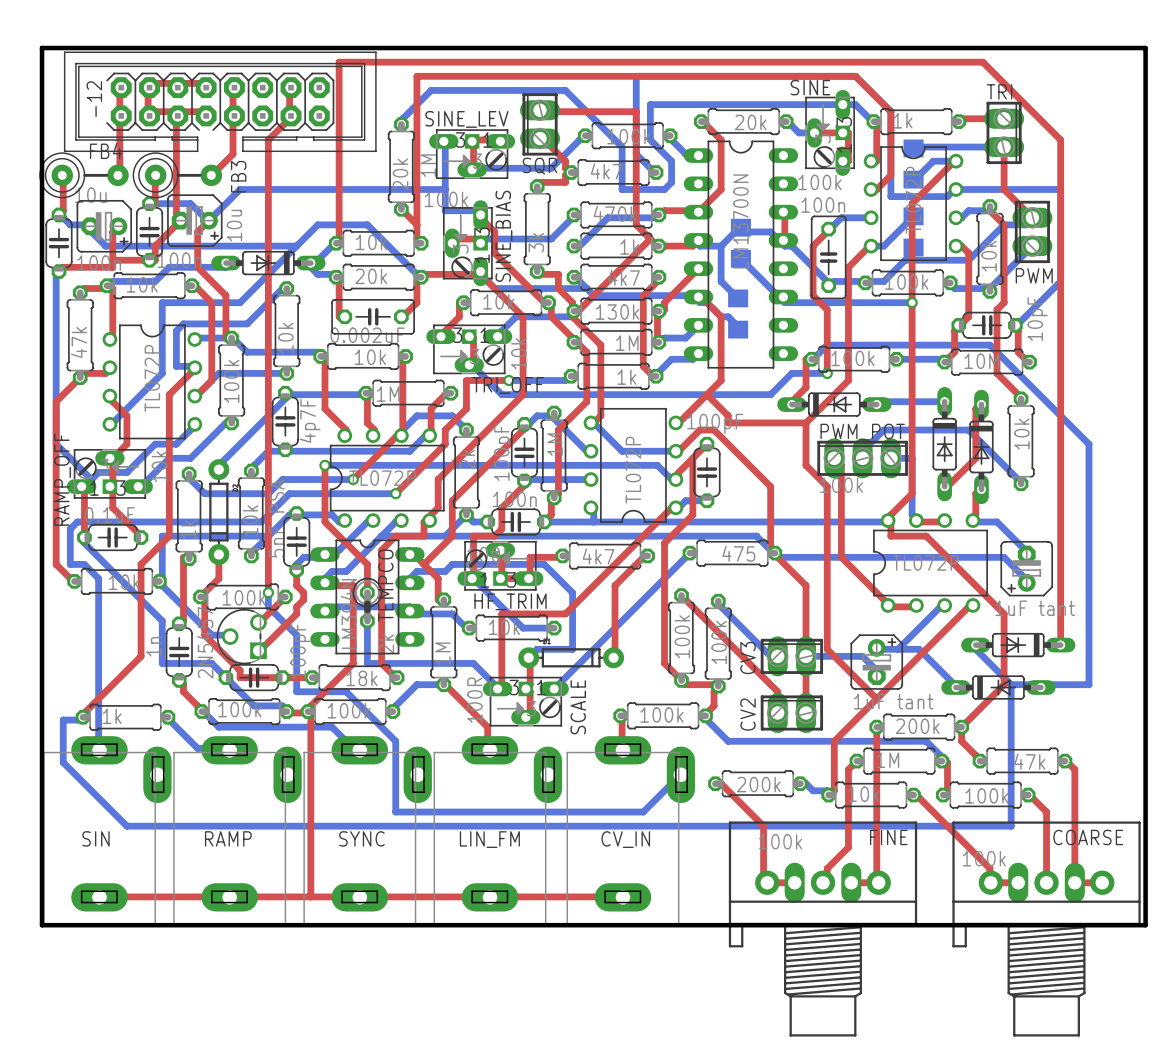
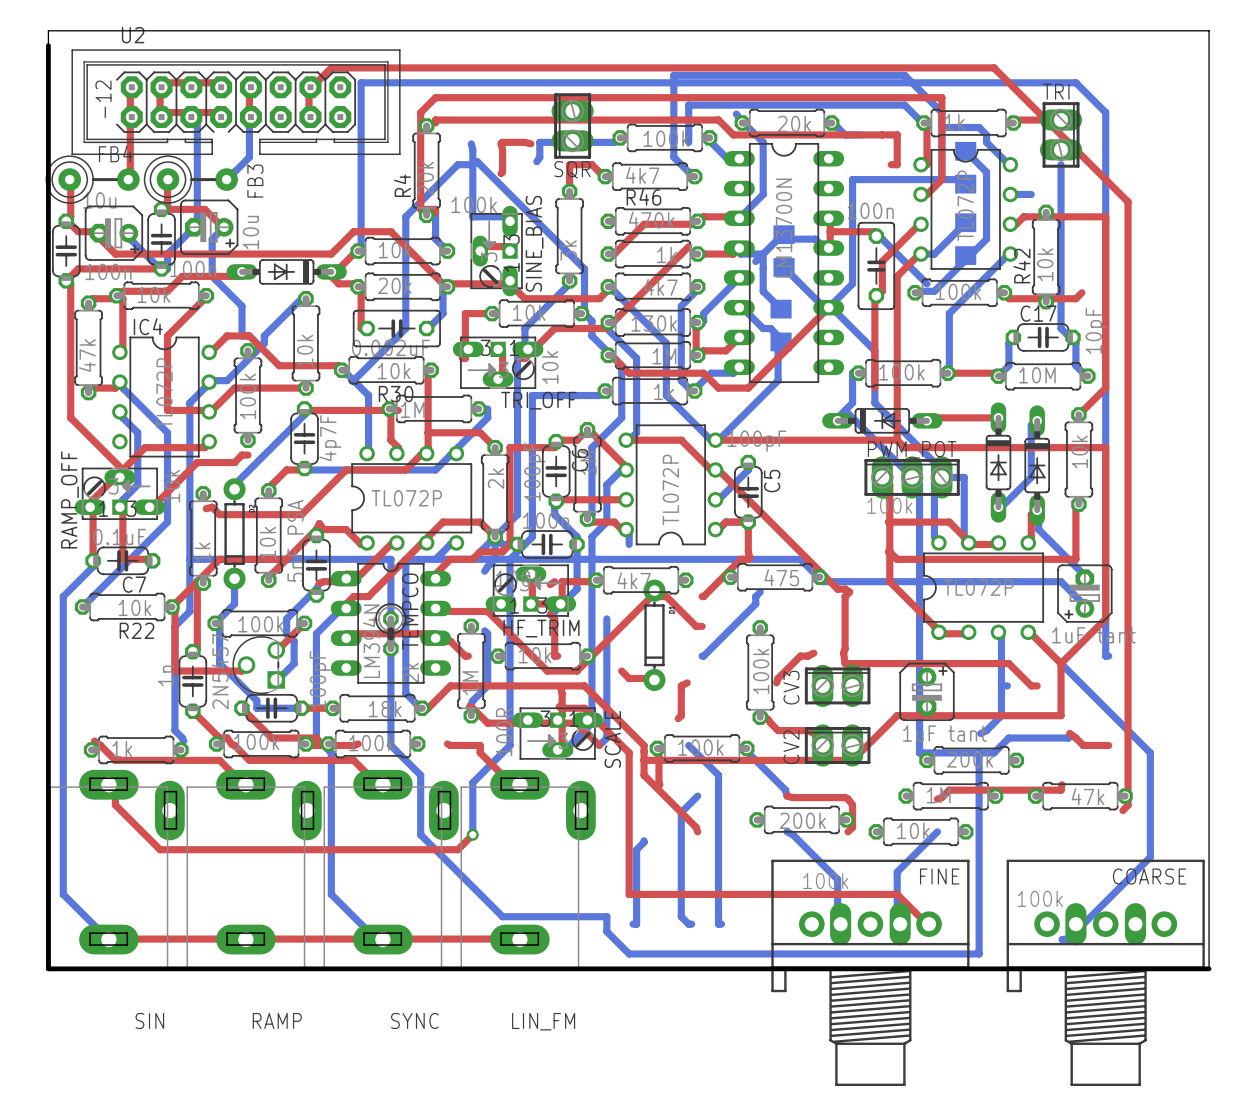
U2 name: none -> U2 (133, 35)
board edge: (42, 48) (1145, 48) (1144, 925) -> (48, 45) (48, 30) (1209, 30) (1209, 968)
top track: none -> (310, 87) (331, 67) (994, 67) (1128, 201) (1128, 805) (1122, 810)
top track: (540, 110) (636, 111) (636, 224) (657, 246) -> none
top track: (890, 111) (855, 76) (416, 76) (416, 239) (421, 243) -> (941, 112) (941, 97) (435, 97) (420, 112) (420, 209) (435, 209) (435, 212)
bottom track: none -> (736, 114) (763, 142) (763, 194) (739, 218)
top track: (177, 115) (176, 217) (180, 220) (155, 246) (155, 260) (149, 260) -> none
bottom track: none -> (191, 117) (197, 120) (197, 224) (167, 254) (167, 268) (160, 268) (130, 239) (128, 233)
top track: (234, 115) (233, 154) (211, 175) -> none
bottom track: none -> (250, 117) (249, 157) (232, 173)
top track: (291, 115) (268, 139) (268, 592) -> none
top track: none -> (435, 123) (435, 120) (718, 120) (733, 134) (861, 134)
top track: (701, 121) (721, 139) (721, 189) (698, 212) -> none
bottom track: (401, 124) (402, 118) (431, 90) (565, 90) (622, 147) (622, 189) (664, 189) (671, 182) (671, 161) (650, 139) -> none
SINE: 100k (830, 132) -> none
top track: (540, 138) (544, 139) (565, 161) (565, 168) -> none
bottom track: (579, 139) (551, 168) (472, 169) -> (614, 142) (539, 142) (539, 157) (536, 161)
top track: (1004, 147) (1004, 189) (1032, 217) -> none
bottom track: (1004, 147) (913, 148) -> (965, 255) (971, 254) (986, 239) (986, 172) (965, 151)
SINE_LEV: 1M (472, 154) -> none
bottom track: (954, 161) (933, 161) (913, 179) -> (1008, 164) (986, 142) (986, 134) (979, 127) (941, 127)
top track: (955, 161) (912, 203) (912, 493) (890, 514) (888, 520) (890, 521) (890, 536) -> (888, 551) (897, 559) (941, 559)
bottom track: none -> (1061, 164) (1061, 328) (1072, 337) (1075, 343) (1075, 365) (1087, 376)
top track: (571, 172) (565, 175) (565, 182) (537, 182) -> (599, 172) (591, 164) (569, 164) (569, 187)
bottom track: (890, 175) (890, 196) (947, 196) (955, 189) -> none
R4 name: none -> R4 (402, 185)
bottom track: (445, 189) (240, 189) (208, 220) (190, 203) (149, 203) -> none
bottom track: (975, 189) (1060, 189) (1060, 281) (1015, 325) -> none
R46 name: none -> R46 (643, 197)
bottom track: none -> (435, 212) (435, 239) (447, 251)
bottom track: (989, 206) (989, 210) (968, 210) (961, 217) (955, 217) -> none
top track: (401, 209) (416, 224) -> none
top track: (989, 210) (1004, 224) (1004, 302) (997, 309) (997, 373) (1021, 398) -> (1010, 224) (1016, 224) (1023, 216) (1105, 216) (1105, 388) (1078, 414)
bottom track: (59, 214) (70, 224) (90, 226) (91, 231) (105, 246) (296, 246) -> none
top track: (480, 214) (480, 217) (494, 231) (494, 253) (544, 302) (551, 302) (551, 316) (572, 338) (573, 342) -> none
bottom track: (573, 214) (551, 239) (480, 239) (480, 243) -> none
top track: none -> (697, 221) (696, 224) (644, 224) (614, 254) (608, 254)
bottom track: (658, 214) (657, 217) (607, 217) (579, 246) (573, 246) -> none
bottom track: (871, 217) (841, 217) (828, 229) -> (927, 283) (882, 239) (876, 236)
bottom track: (1032, 217) (1025, 224) (1004, 224) (968, 260) (905, 260) -> none
top track: (208, 220) (197, 231) (197, 267) (225, 295) (225, 338) (231, 338) -> (224, 227) (204, 209) (167, 209)
top track: none -> (830, 231) (874, 231) (876, 236)
top track: (118, 226) (112, 231) (112, 267) (63, 267) -> (122, 268) (78, 268) (70, 276)
top track: (828, 229) (813, 246) (813, 295) (827, 309) -> (921, 224) (882, 261) (882, 291) (874, 298) (874, 321)
PWM: (1032, 231) -> none
bottom track: (783, 240) (784, 246) (791, 246) (827, 281) (828, 285) (834, 281) (865, 282) -> none
top track: (336, 243) (339, 239) (339, 62) (982, 62) (1060, 139) (1060, 645) -> (358, 251) (338, 268) (331, 268) (331, 276) (338, 283) (353, 283) (358, 286)
bottom track: (336, 243) (317, 260) (310, 260) (310, 267) (317, 274) (332, 274) (336, 277) -> (358, 251) (361, 246) (361, 82) (1075, 82) (1105, 112) (1105, 656) (1108, 656)
bottom track: none -> (763, 254) (755, 261)
top track: (955, 246) (961, 246) (968, 253) (968, 316) (954, 330) (954, 352) (944, 362) -> (947, 373) (994, 373) (998, 376)
bottom track: none -> (1010, 254) (949, 313) (949, 373)
bottom track: (1032, 246) (989, 288) -> none
R42 name: none -> R42 (1021, 266)
top track: none -> (241, 271) (241, 276) (182, 276) (167, 291) (122, 291) (116, 295)
bottom track: (225, 263) (225, 267) (169, 267) (155, 281) (112, 281) (107, 285) -> none
top track: (698, 268) (664, 302) (664, 309) (658, 311) -> none
bottom track: none -> (739, 277) (703, 313) (703, 321) (697, 322)
top track: none -> (66, 280) (70, 283) (70, 417) (122, 469)
bottom track: (59, 271) (56, 274) (56, 444) (91, 479) (81, 486) (84, 486) (98, 472) (126, 472) (155, 444) (176, 444) (194, 424) -> none
bottom track: (480, 271) (480, 274) (494, 288) (586, 288) -> none
top track: (537, 271) (537, 274) (558, 274) (558, 288) (572, 302) (573, 311) -> none
bottom track: none -> (569, 280) (569, 283) (524, 328) (524, 358) (517, 358) (517, 514) (495, 536) (495, 559) (484, 571)
top track: (421, 277) (416, 281) (416, 302) (401, 316) -> (447, 286) (390, 231) (353, 231) (331, 254) (115, 254) (100, 239) (99, 233) (78, 231) (66, 221)
bottom track: (421, 277) (367, 224) (317, 224) (240, 302) (162, 302) (162, 373) (109, 424) -> (447, 286) (443, 291) (443, 313) (426, 328)
top track: (658, 277) (657, 281) (643, 295) (643, 366) (656, 376) -> none
bottom track: none -> (697, 286) (696, 291) (681, 306) (681, 380) (694, 391)
top track: none -> (1004, 292) (1008, 298) (1075, 298) (1081, 292)
bottom track: (950, 282) (954, 288) (989, 288) -> none
top track: (191, 285) (197, 288) (211, 302) (211, 380) -> (206, 295) (167, 335) (167, 410) (209, 411)
top track: (494, 288) (523, 316) (523, 394) (438, 479) (438, 507) (431, 514) (429, 520) (424, 521) (424, 536) (395, 536) (381, 550) (381, 663) (397, 677) -> (524, 298) (599, 298) (608, 286)
bottom track: (593, 295) (692, 295) (698, 297) (699, 302) (706, 302) -> (629, 306) (666, 343) (666, 395) (711, 440) (718, 440) (778, 380) (778, 343) (781, 341)
top track: (698, 297) (699, 295) (721, 316) (721, 380) (678, 422) -> none
bottom track: (783, 297) (784, 302) (912, 302) -> (828, 307) (852, 283) (852, 179) (964, 179) (965, 184)
top track: (459, 302) (459, 316) (441, 336) -> (487, 313) (465, 313) (465, 358) (462, 358)
bottom track: none -> (584, 313) (591, 321) (591, 335) (606, 350) (608, 355) (621, 365) (621, 417) (591, 447) (591, 514) (587, 519)
bottom track: none -> (584, 313) (584, 268) (477, 161) (472, 164) (457, 164) (405, 216) (405, 328) (353, 380)
via: (912, 302) -> none
C17 name: none -> C17 (1038, 313)
IC4 name: none -> IC4 (148, 326)
top track: (572, 316) (600, 345) (600, 415) (593, 422) -> (606, 328) (554, 328) (524, 358) (521, 358)
bottom track: (572, 316) (515, 316) (497, 336) -> (606, 328) (636, 358) (636, 432) (629, 440)
bottom track: (225, 323) (183, 323) (176, 330) (176, 366) (194, 367) -> (241, 335) (241, 306) (212, 276) (212, 239) (224, 227)
bottom track: (231, 323) (247, 323) -> none
top track: none -> (739, 337) (725, 350) (703, 350) (697, 355)
bottom track: (698, 325) (685, 338) (664, 338) (658, 342) -> none
top track: (1015, 325) (1018, 330) (1018, 352) (1029, 362) -> none
bottom track: (194, 339) (233, 338) (247, 352) (317, 352) (320, 356) -> (367, 453) (368, 395) (341, 370)
top track: (586, 352) (586, 401) (558, 430) (558, 493) (551, 500) (551, 514) (544, 521) -> (621, 365) (629, 373) (703, 373) (718, 388) (748, 388) (828, 307)
top track: (320, 356) (324, 359) (324, 408) (346, 430) (344, 435) -> (341, 370) (338, 365) (279, 365) (249, 335) (227, 335) (209, 352)
top track: (811, 359) (806, 359) (806, 387) (791, 401) (791, 404) -> none
bottom track: (811, 359) (827, 345) (989, 345) (1088, 444) (1088, 684) (1046, 684) (1040, 687) (1039, 684) (1011, 684) -> (858, 373) (852, 373) (852, 402) (837, 417) (837, 420)
bottom track: (897, 359) (940, 359) (944, 362) -> (1013, 337) (1008, 343) (1008, 365) (998, 376)
bottom track: (469, 364) (473, 366) (501, 394) (770, 394) (791, 373) (827, 373) -> none
bottom track: none -> (119, 382) (122, 388) (167, 432) (167, 522) (82, 606)
top track: (194, 367) (169, 394) (169, 536) (141, 564) (141, 656) (84, 712) (83, 717) -> none
top track: none -> (306, 388) (234, 388) (227, 395)
bottom track: (286, 373) (218, 373) (194, 396) -> none
via: (827, 373) -> none
top track: (80, 377) (56, 401) (56, 564) (74, 581) -> none
R30 name: none -> R30 (396, 394)
top track: (508, 380) (466, 380) (466, 408) (445, 430) (445, 444) (395, 493) -> none
bottom track: none -> (539, 395) (532, 395) (532, 536) (510, 559) (510, 745) (472, 782) (472, 834)
via: (508, 380) -> none
top track: (848, 380) (806, 422) (806, 465) (827, 486) (827, 649) (876, 698) -> (897, 395) (897, 440)
top track: none -> (304, 408) (398, 410)
bottom track: (366, 393) (289, 394) -> none
top track: (450, 393) (445, 394) (431, 408) (429, 435) -> none
bottom track: none -> (487, 408) (487, 417) (457, 447) (456, 453)
top track: (706, 394) (728, 415) (728, 422) -> (718, 440) (770, 440)
bottom track: none -> (845, 410) (919, 484) (919, 752) (994, 752) (1008, 738) (1068, 738) (1069, 733)
top track: (109, 396) (112, 401) (126, 415) (126, 444) (112, 458) (112, 486) -> none
bottom track: none -> (119, 411) (122, 417) (137, 432) (137, 484) (122, 499) (122, 507) (119, 507)
top track: none -> (998, 417) (927, 417) (927, 420)
bottom track: (944, 401) (876, 401) (876, 404) -> none
top track: (981, 404) (975, 408) (975, 458) (947, 486) (944, 486) -> none
bottom track: none -> (1037, 420) (1031, 425) (1031, 477) (1001, 507) (998, 507)
top track: none -> (428, 432) (480, 432) (495, 447)
bottom track: (551, 415) (586, 451) -> (569, 751) (569, 745) (591, 723) (591, 536) (606, 522) (606, 484) (621, 469)
bottom track: (551, 415) (537, 415) (530, 422) (524, 424) -> none
bottom track: (231, 422) (225, 422) (190, 458) (169, 458) (141, 486) (138, 486) -> none
top track: none -> (629, 440) (681, 440) (711, 469) (715, 469)
bottom track: (593, 422) (622, 451) (675, 451) -> none
top track: none -> (852, 440) (897, 440)
top track: none -> (209, 441) (204, 447) (145, 447) (85, 507) (90, 507)
top track: none -> (556, 441) (577, 440) (587, 429) (629, 469) (626, 469)
bottom track: (466, 430) (452, 415) (416, 415) (402, 430) (401, 435) -> none
top track: (523, 430) (452, 500) (452, 536) (424, 564) -> (554, 447) (510, 447) (510, 544) (502, 551) (480, 551) (472, 559) (450, 559) (435, 574)
top track: none -> (247, 455) (241, 455) (234, 462) (197, 462) (152, 507) (149, 507)
C6 name: none -> C6 (580, 460)
top track: (706, 444) (678, 472) (678, 479) (675, 479) -> none
bottom track: none -> (748, 462) (748, 469) (718, 499) (715, 499)
top track: none -> (304, 468) (286, 469) (271, 484) (268, 490)
bottom track: (285, 449) (268, 451) (254, 465) (251, 471) -> none
top track: (381, 451) (353, 479) -> (405, 469) (346, 469) (301, 514) (219, 514) (212, 507) (206, 508)
top track: (678, 451) (699, 430) (714, 430) (770, 486) (770, 550) (806, 585) (806, 712) -> (718, 469) (837, 589) (845, 589) (849, 592) (845, 596) (845, 663) (1008, 663) (1031, 685) (1037, 685)
top track: (692, 458) (692, 514) (664, 543) (664, 663) (685, 684) (718, 686) (714, 691) (714, 705) (705, 715) -> none
bottom track: (862, 458) (862, 451) (883, 430) (968, 430) (1021, 483) -> none
C5 name: none -> C5 (772, 481)
top track: (324, 465) (324, 521) (367, 564) (367, 592) -> none
bottom track: (324, 465) (657, 465) (671, 479) -> none
via: (324, 465) -> none
bottom track: (189, 473) (190, 479) (204, 493) (268, 493) (282, 479) (353, 479) -> none
via: (353, 479) -> none
bottom track: (590, 479) (524, 480) -> (550, 614) (577, 589) (577, 536) (554, 514) (556, 501)
top track: (524, 480) (523, 486) (501, 507) (501, 529) (494, 536) (473, 536) (472, 578) -> (556, 501) (626, 499)
bottom track: (395, 493) (289, 493) (261, 521) (77, 521) (70, 529) (70, 564) (84, 564) (98, 578) (99, 750) -> none
via: (395, 493) -> none
top track: none -> (587, 519) (591, 522) (614, 522) (621, 529) (626, 529)
top track: none -> (888, 522) (949, 522) (968, 542)
top track: (112, 507) (141, 536) -> (122, 529) (122, 559) (152, 559)
top track: (675, 507) (671, 507) (565, 613) (501, 613) (501, 684) (497, 688) -> (715, 529) (718, 529) (725, 522) (748, 522) (749, 557) (740, 559) (702, 596)
top track: none -> (367, 542) (361, 544) (346, 529) (323, 529) (319, 523) (316, 529) (271, 574) (268, 580)
bottom track: (344, 520) (339, 521) (332, 514) (289, 514) (254, 550) (251, 555) -> none
top track: none -> (396, 542) (390, 544) (361, 574) (346, 574) (346, 581) (319, 583)
bottom track: (373, 520) (367, 521) (339, 550) (324, 550) (324, 557) (303, 557) (296, 564) (296, 570) -> none
bottom track: (401, 520) (395, 521) (346, 571) (332, 571) (324, 578) -> (316, 663) (316, 633) (346, 604)
bottom track: none -> (456, 542) (450, 544) (435, 559)
bottom track: (888, 520) (544, 521) -> (938, 542) (934, 536) (934, 462) (874, 402) (874, 350) (830, 306)
bottom track: (972, 520) (997, 521) -> (1037, 510) (1038, 529) (1053, 544)
bottom track: (176, 536) (162, 536) (162, 578) (159, 581) (211, 635) (230, 636) -> none
top track: none -> (286, 559) (219, 559) (172, 606) (174, 611) (174, 671) (241, 671) (246, 665)
bottom track: none -> (286, 559) (390, 559) (390, 648)
bottom track: none -> (405, 559) (405, 693) (422, 708)
top track: (926, 536) (1004, 613) (1004, 635) -> (979, 559) (1075, 559) (1075, 507) (1078, 504)
bottom track: (84, 543) (162, 621) -> (264, 335) (264, 343) (227, 380) (209, 382) (189, 402) (189, 611) (174, 626) (174, 648)
bottom track: none -> (93, 566) (63, 596) (63, 894) (108, 939)
top track: (409, 550) (438, 578) (438, 599) (443, 599) -> none
bottom track: (690, 553) (554, 688) -> none
top track: (218, 554) (218, 578) (200, 596) (204, 599) (204, 635) (240, 670) (240, 677) (282, 677) -> none
bottom track: none -> (234, 578) (234, 604) (215, 623) (219, 626) (219, 663) (256, 700) (256, 708) (301, 708)
top track: (647, 555) (643, 557) (615, 585) (613, 657) -> none
top track: none -> (554, 581) (550, 584)
bottom track: none -> (319, 583) (316, 589) (286, 618)
C7 name: none -> C7 (134, 584)
bottom track: none -> (760, 592) (755, 596) (755, 604) (702, 656)
top track: (296, 570) (296, 585) (303, 592) (303, 599) (296, 606) (296, 613) (258, 650) -> none
bottom track: (472, 578) (523, 628) (554, 628) -> none
top track: (324, 582) (324, 585) (353, 585) (353, 663) (310, 705) (308, 711) (310, 712) (310, 896) -> (346, 608) (346, 604) (353, 596) (368, 596) (420, 544) (426, 542) (428, 536) (443, 522) (480, 522) (495, 536)
top track: none -> (435, 608) (435, 611) (487, 611) (547, 671) (577, 671) (651, 596) (654, 590) (658, 596) (666, 596) (696, 626) (702, 626)
bottom track: (409, 582) (409, 578) (416, 571) (445, 571) (452, 564) (544, 564) (572, 592) -> none
top track: none -> (550, 614) (554, 618) (554, 656) (557, 656)
via: (268, 592) -> none
top track: (681, 595) (777, 691) (777, 712) -> none
bottom track: (718, 601) (721, 606) (770, 656) (777, 656) -> none
R22 name: none -> R22 (136, 630)
bottom track: none -> (484, 630) (487, 633) (487, 685) (472, 700) (469, 706)
bottom track: (944, 605) (940, 606) (897, 649) -> (998, 632) (1001, 633) (1001, 715) (986, 730) (980, 733)
top track: (972, 605) (968, 606) (834, 741) (834, 790) (828, 795) -> (1028, 632) (1061, 663) (1105, 618) (1105, 447) (904, 447) (897, 440)
top track: none -> (346, 638) (346, 633) (435, 633) (435, 641) (450, 641) (465, 656) (468, 656)
bottom track: (324, 611) (324, 606) (409, 606) (409, 613) (452, 613) (466, 628) (469, 628) -> none
bottom track: (275, 613) (296, 635) -> (294, 641) (294, 663) (276, 679)
top track: none -> (813, 653) (807, 656) (800, 656) (778, 678) (776, 682)
bottom track: none -> (1061, 663) (1150, 752) (1150, 857) (1068, 939) (1061, 939)
part: 100k (681, 637) -> none
top track: none -> (621, 671) (629, 678) (654, 679)
bottom track: (975, 645) (975, 649) (1011, 684) -> none
part: (1018, 645) -> none
bottom track: (876, 647) (919, 649) (955, 687) -> none
bottom track: (572, 649) (537, 649) (528, 657) -> (606, 678) (606, 738) (599, 745)
top track: none -> (687, 682) (681, 685) (681, 715) (678, 718)
bottom track: (806, 656) (862, 656) (876, 670) (876, 676) -> none
bottom track: none -> (1001, 685) (1007, 685)
part rotation: 0° (571, 657) -> 90° clockwise (654, 635)
part position: (571, 657) -> (654, 635)
bottom track: (162, 663) (211, 663) (254, 705) (282, 705) (286, 711) -> (174, 693) (174, 730) (183, 741)
bottom track: (367, 663) (473, 663) (497, 688) -> none
top track: none -> (469, 706) (487, 723) (577, 723) (599, 745)
top track: none -> (559, 706) (584, 708) (629, 752) (629, 894) (897, 894) (927, 924)
top track: none -> (241, 708) (271, 738) (316, 738) (323, 745) (358, 743)
top track: none -> (422, 708) (428, 708) (450, 685) (584, 685) (644, 745) (644, 775) (696, 827) (697, 831)
top track: (183, 684) (183, 691) (201, 711) -> (197, 715) (219, 738) (227, 738) (249, 760) (353, 760) (376, 782) (382, 784)
top track: (443, 684) (487, 727) (487, 748) -> (447, 743) (480, 745) (480, 752) (510, 782) (517, 782)
bottom track: (443, 684) (416, 684) (395, 705) (392, 711) -> none
top track: (1004, 684) (961, 727) (961, 741) (980, 761) -> (1061, 715) (897, 715) (852, 760) (644, 760)
bottom track: (1011, 684) (1011, 826) (126, 826) (63, 762) (63, 720) (77, 720) (83, 717) -> none
top track: none -> (767, 718) (778, 730) (807, 730) (813, 733)
part: (998, 687) -> none
bottom track: (296, 691) (346, 691) (367, 712) -> (390, 693) (390, 745)
bottom track: none -> (316, 723) (316, 738) (331, 752) (331, 894) (376, 939) (382, 939)
top track: none -> (1069, 733) (1083, 745) (1108, 745)
top track: none -> (94, 741) (115, 760) (219, 760) (245, 784)
bottom track: (201, 711) (218, 727) (332, 727) (353, 748) (359, 750) -> none
bottom track: none -> (688, 745) (718, 775) (718, 924) (721, 924)
bottom track: (167, 717) (197, 748) (225, 748) (229, 750) -> none
top track: (876, 727) (876, 882) (851, 882) -> none
bottom track: (728, 741) (926, 741) (940, 755) (941, 761) -> (770, 775) (785, 790) (787, 796)
top track: none -> (108, 784) (115, 790) (115, 805) (160, 849) (457, 849) (472, 834)
top track: none -> (1061, 784) (1061, 790) (949, 790) (937, 799)
bottom track: none -> (697, 796) (681, 812) (681, 916) (688, 924) (691, 924)
top track: none -> (787, 796) (848, 799) (852, 805) (852, 827) (848, 831)
top track: (856, 761) (848, 769) (848, 847) (827, 868) (827, 882) (823, 882) -> none
top track: (941, 761) (947, 762) (947, 790) (943, 795) -> none
top track: (1064, 761) (1074, 769) (1074, 882) (1102, 882) -> none
bottom track: (680, 774) (643, 812) (395, 812) (395, 797) -> (979, 752) (979, 953) (629, 953) (606, 931) (606, 916) (502, 916) (420, 834)
top track: (715, 783) (721, 783) (763, 826) (763, 882) (792, 882) -> none
bottom track: (800, 783) (806, 783) (813, 790) (827, 790) (828, 795) -> none
bottom track: none -> (787, 831) (792, 834) (837, 879) (838, 924)
bottom track: none -> (937, 831) (897, 872) (897, 924)
top track: (913, 795) (919, 797) (989, 868) (989, 882) (1018, 882) -> none
part: 100k (985, 795) -> none
top track: (1028, 795) (1046, 812) (1046, 882) -> none
via: none -> (472, 834)
bottom track: none -> (644, 840) (636, 849) (636, 924) (633, 924)
CV_IN: (630, 831) -> none
SIN name position: SIN (95, 838) -> SIN (149, 1020)
RAMP name position: RAMP (228, 838) -> RAMP (277, 1020)
SYNC name position: SYNC (361, 838) -> SYNC (414, 1020)
LIN_FM name position: LIN_FM (489, 839) -> LIN_FM (543, 1021)
top track: (489, 897) (622, 897) -> none

